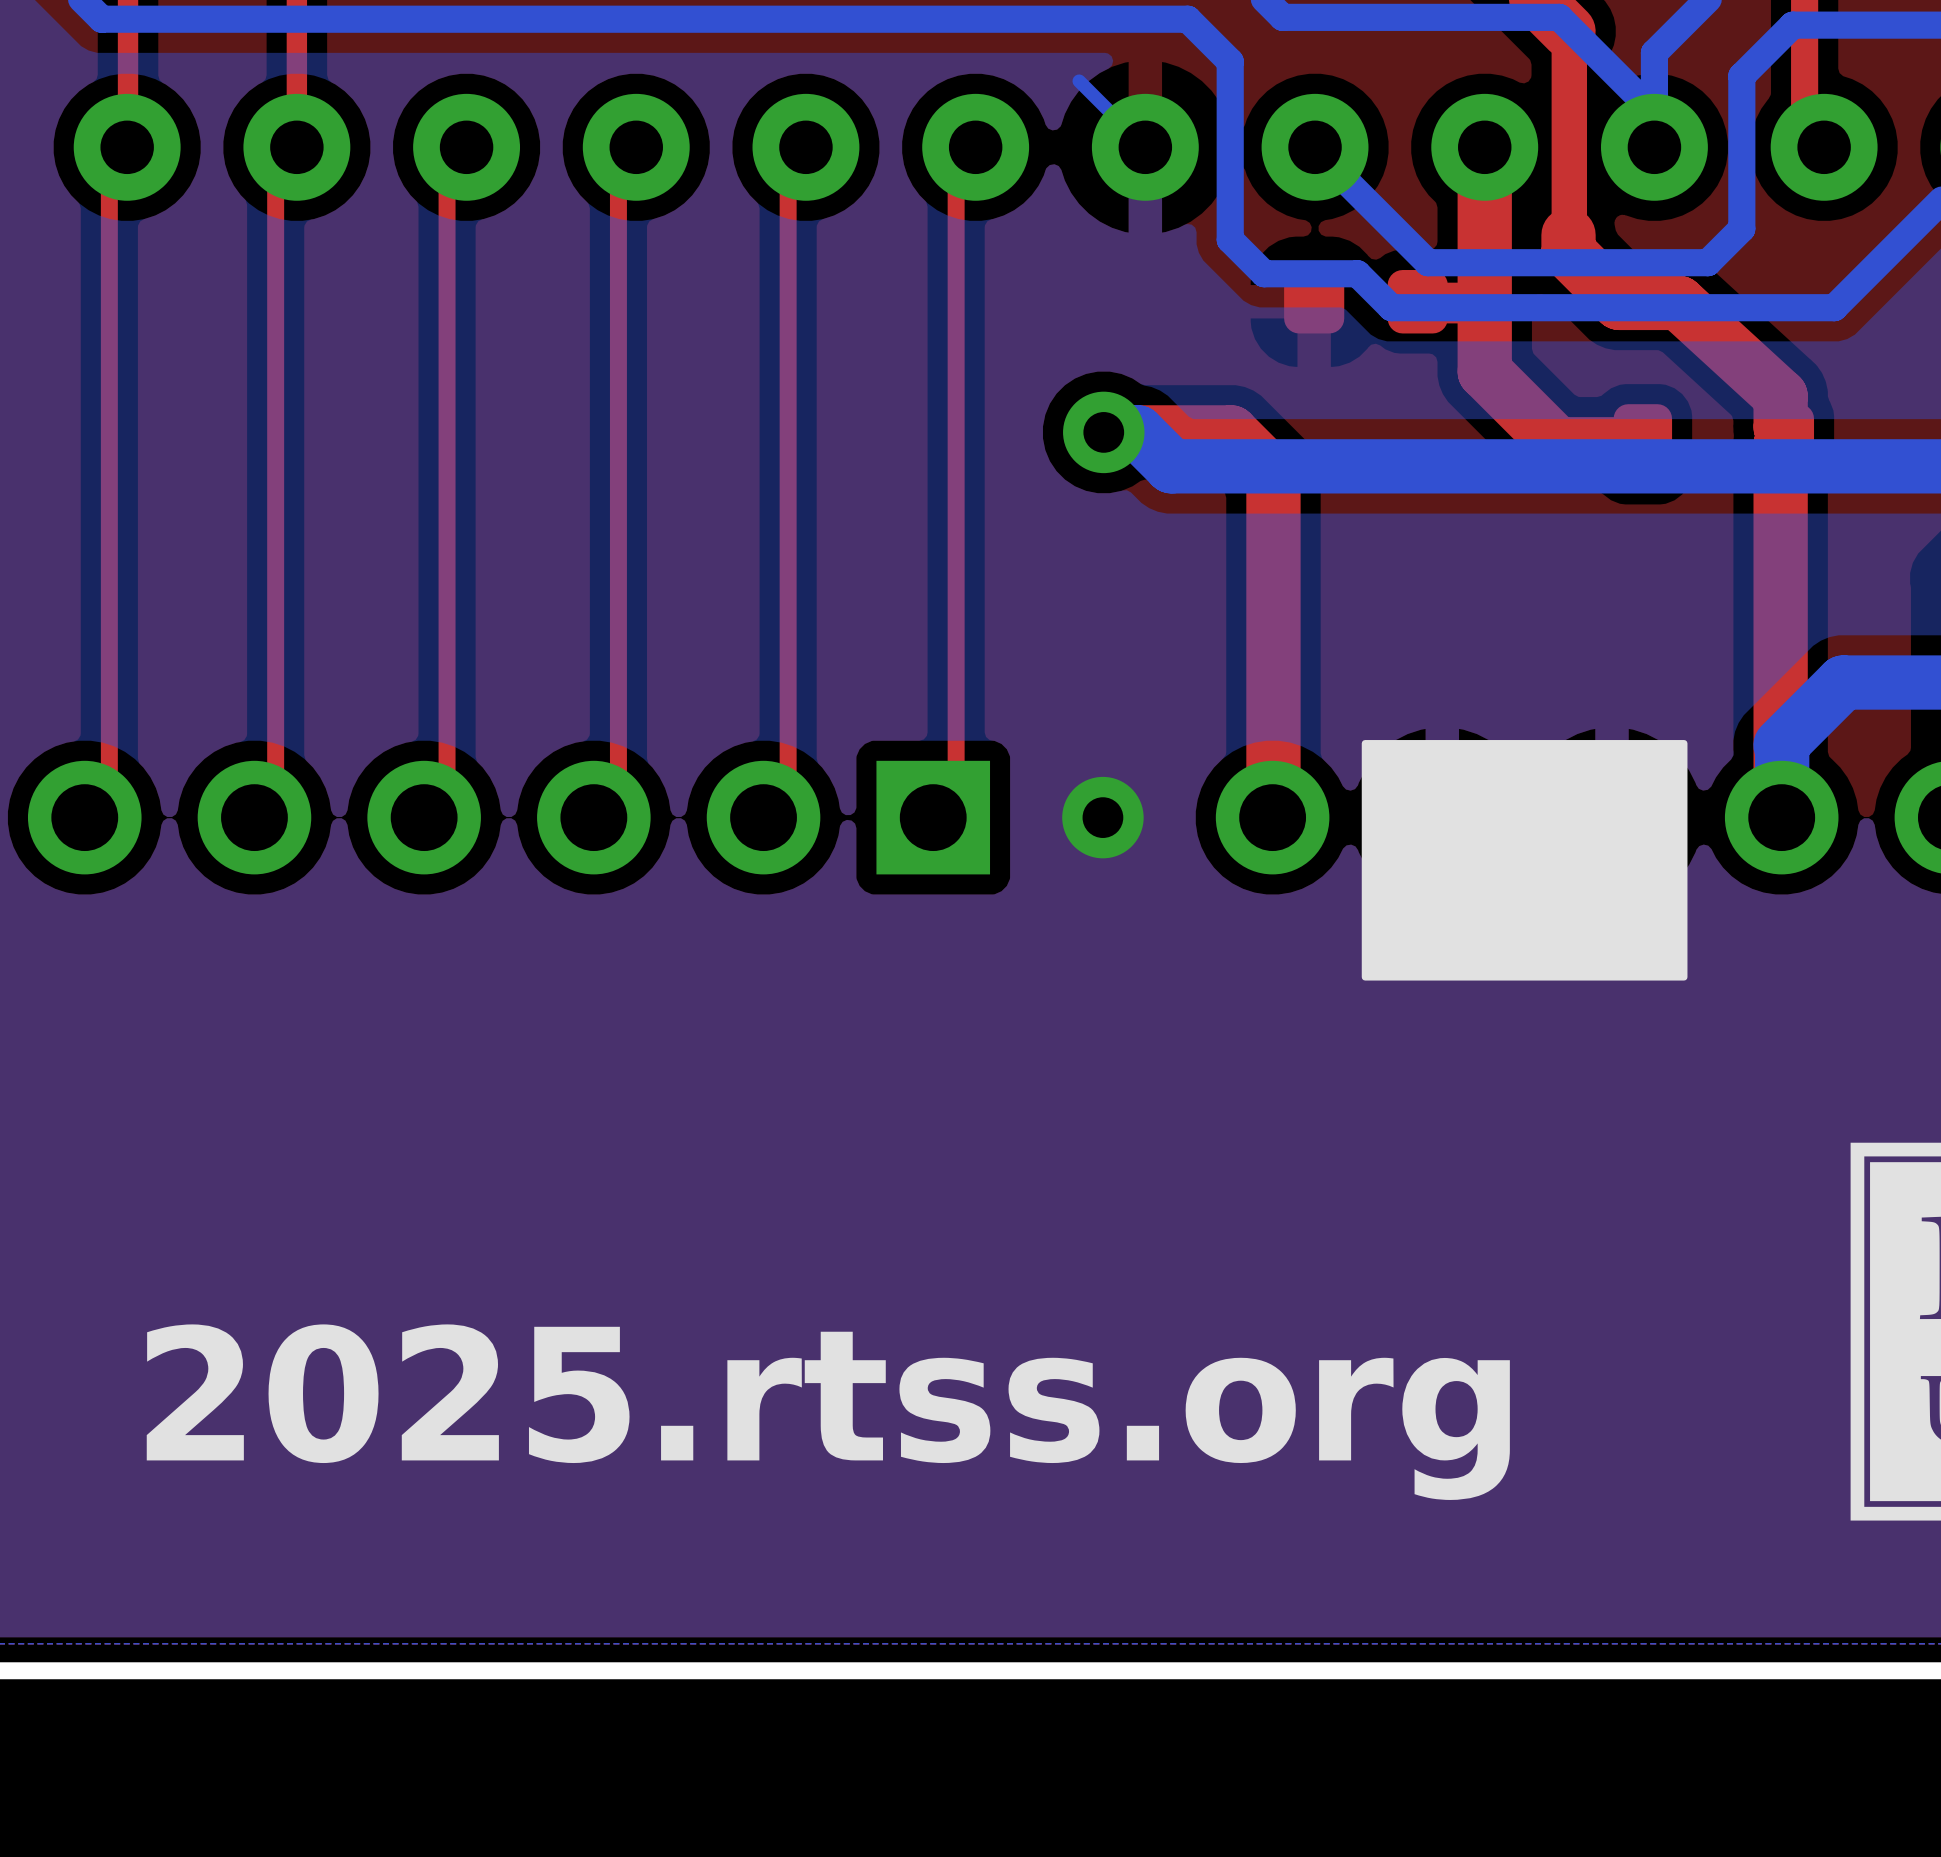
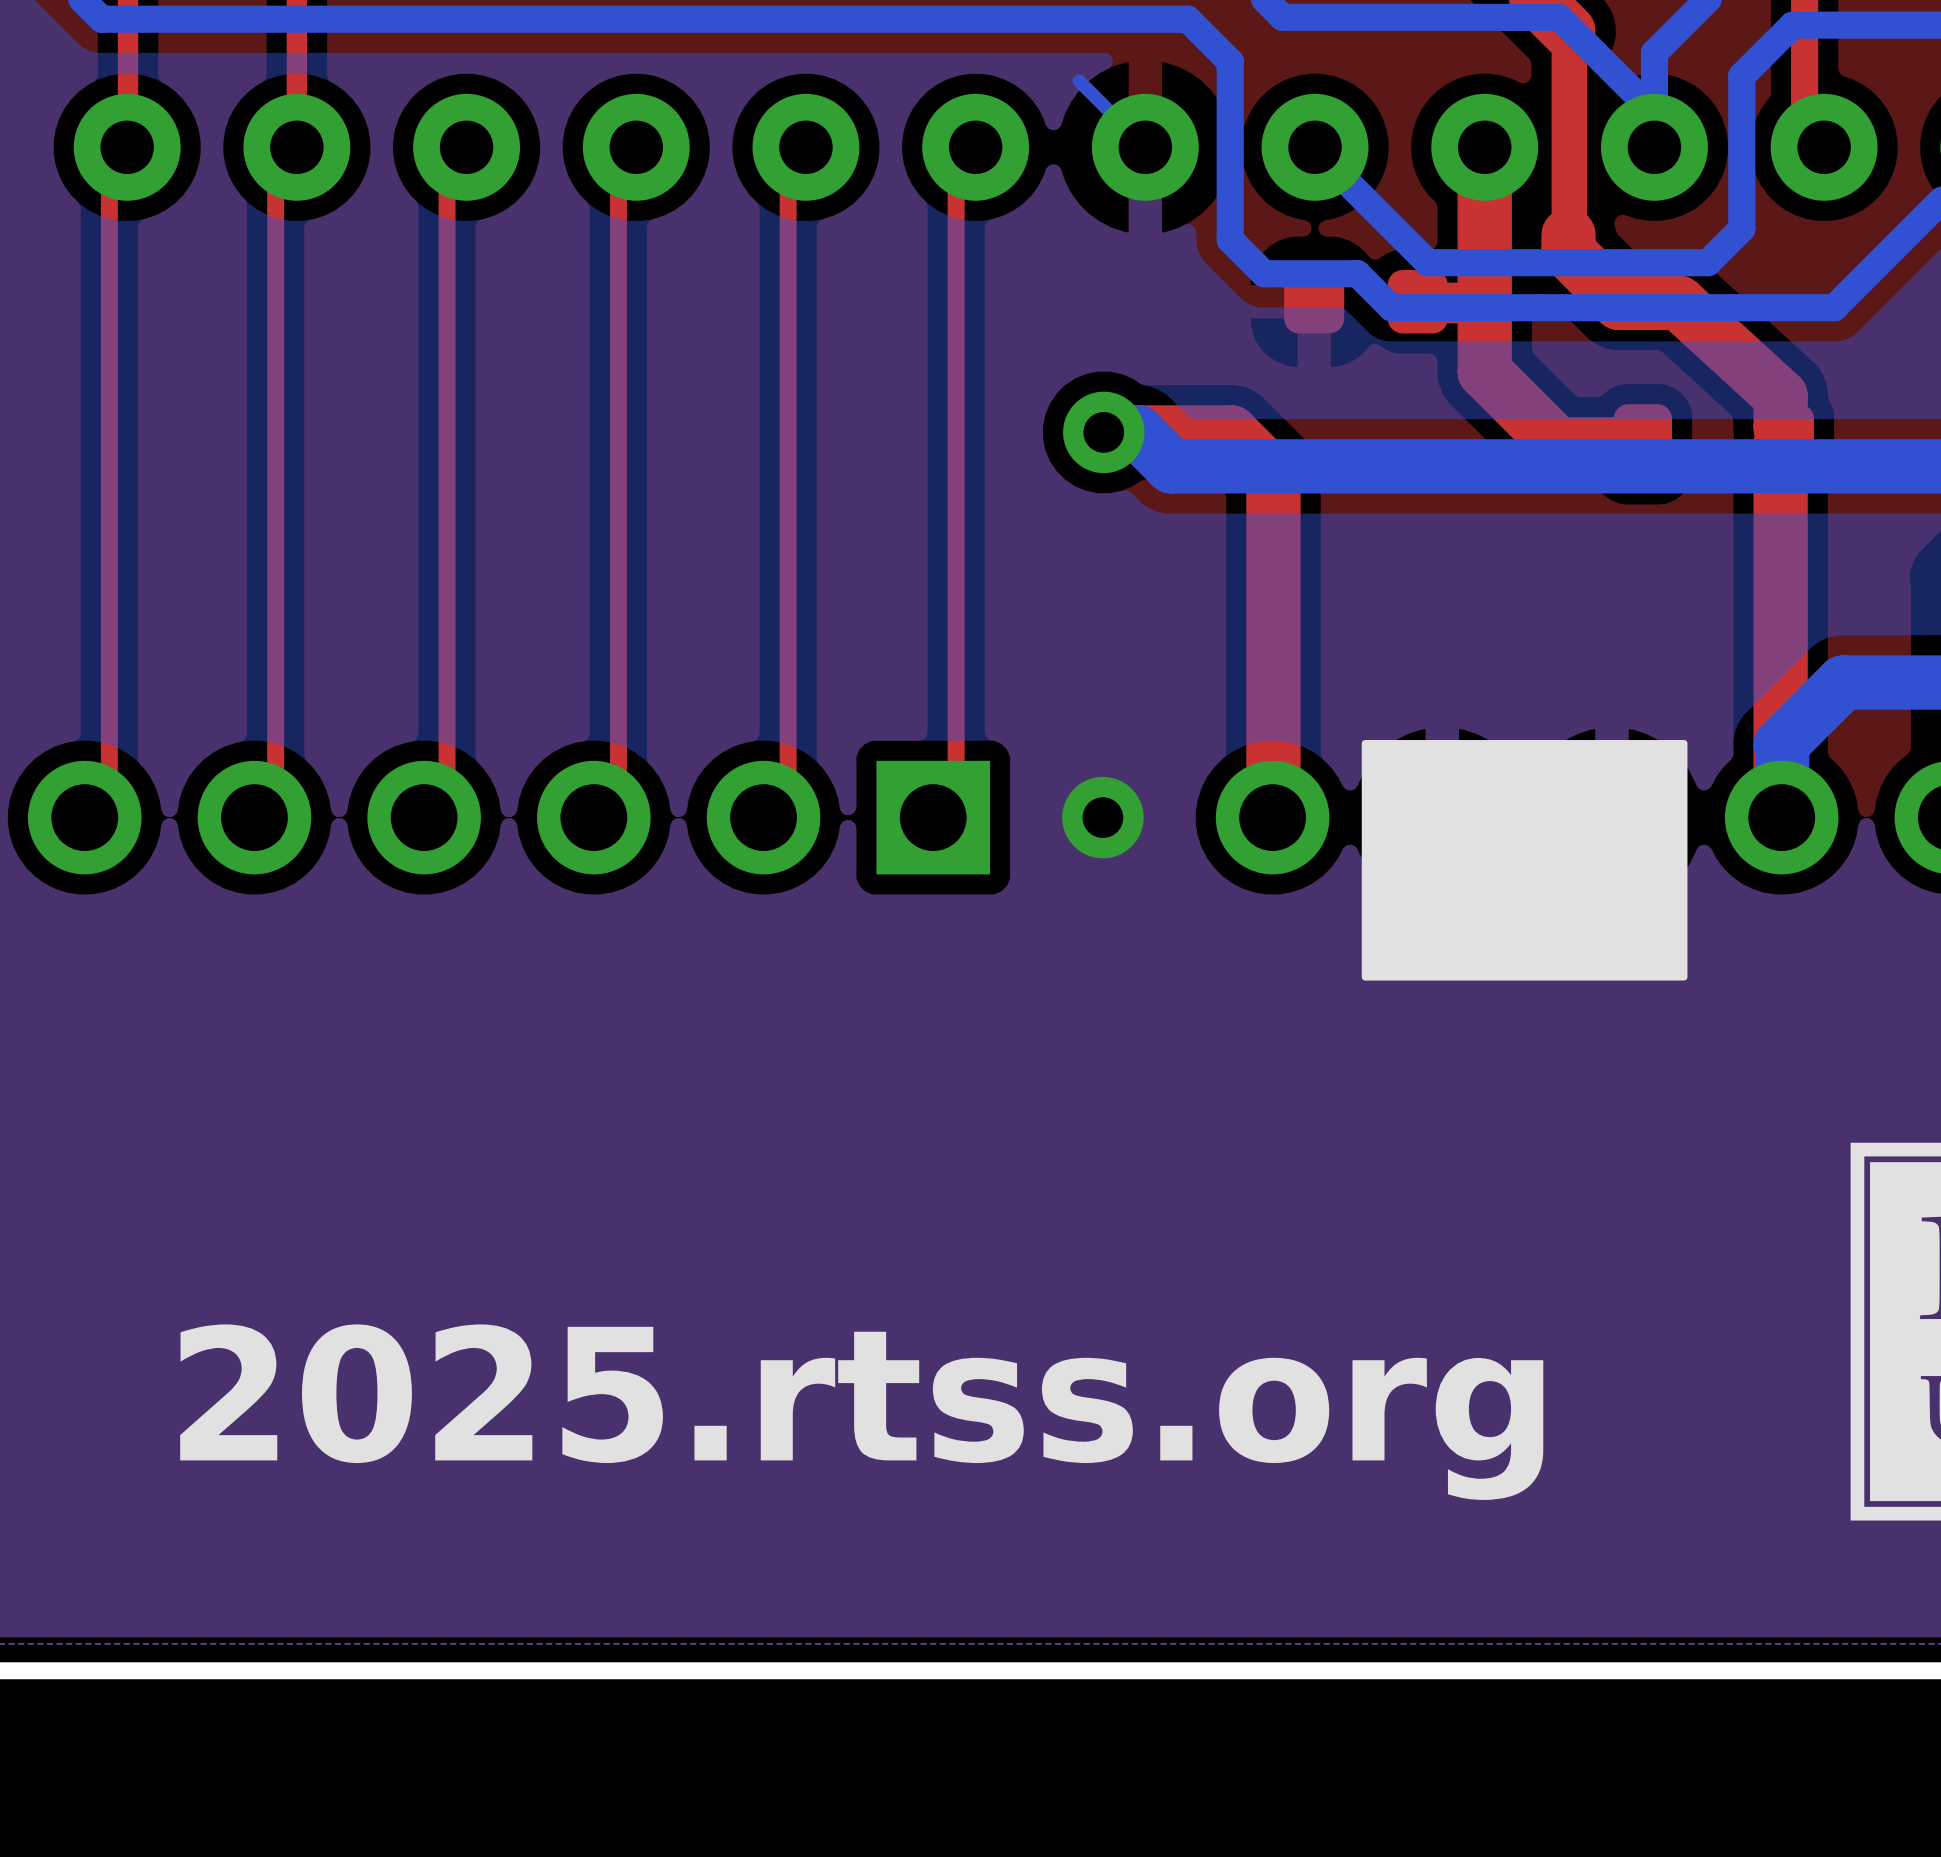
text position: 2025.rtss.org (828, 1412) -> 2025.rtss.org (861, 1412)

